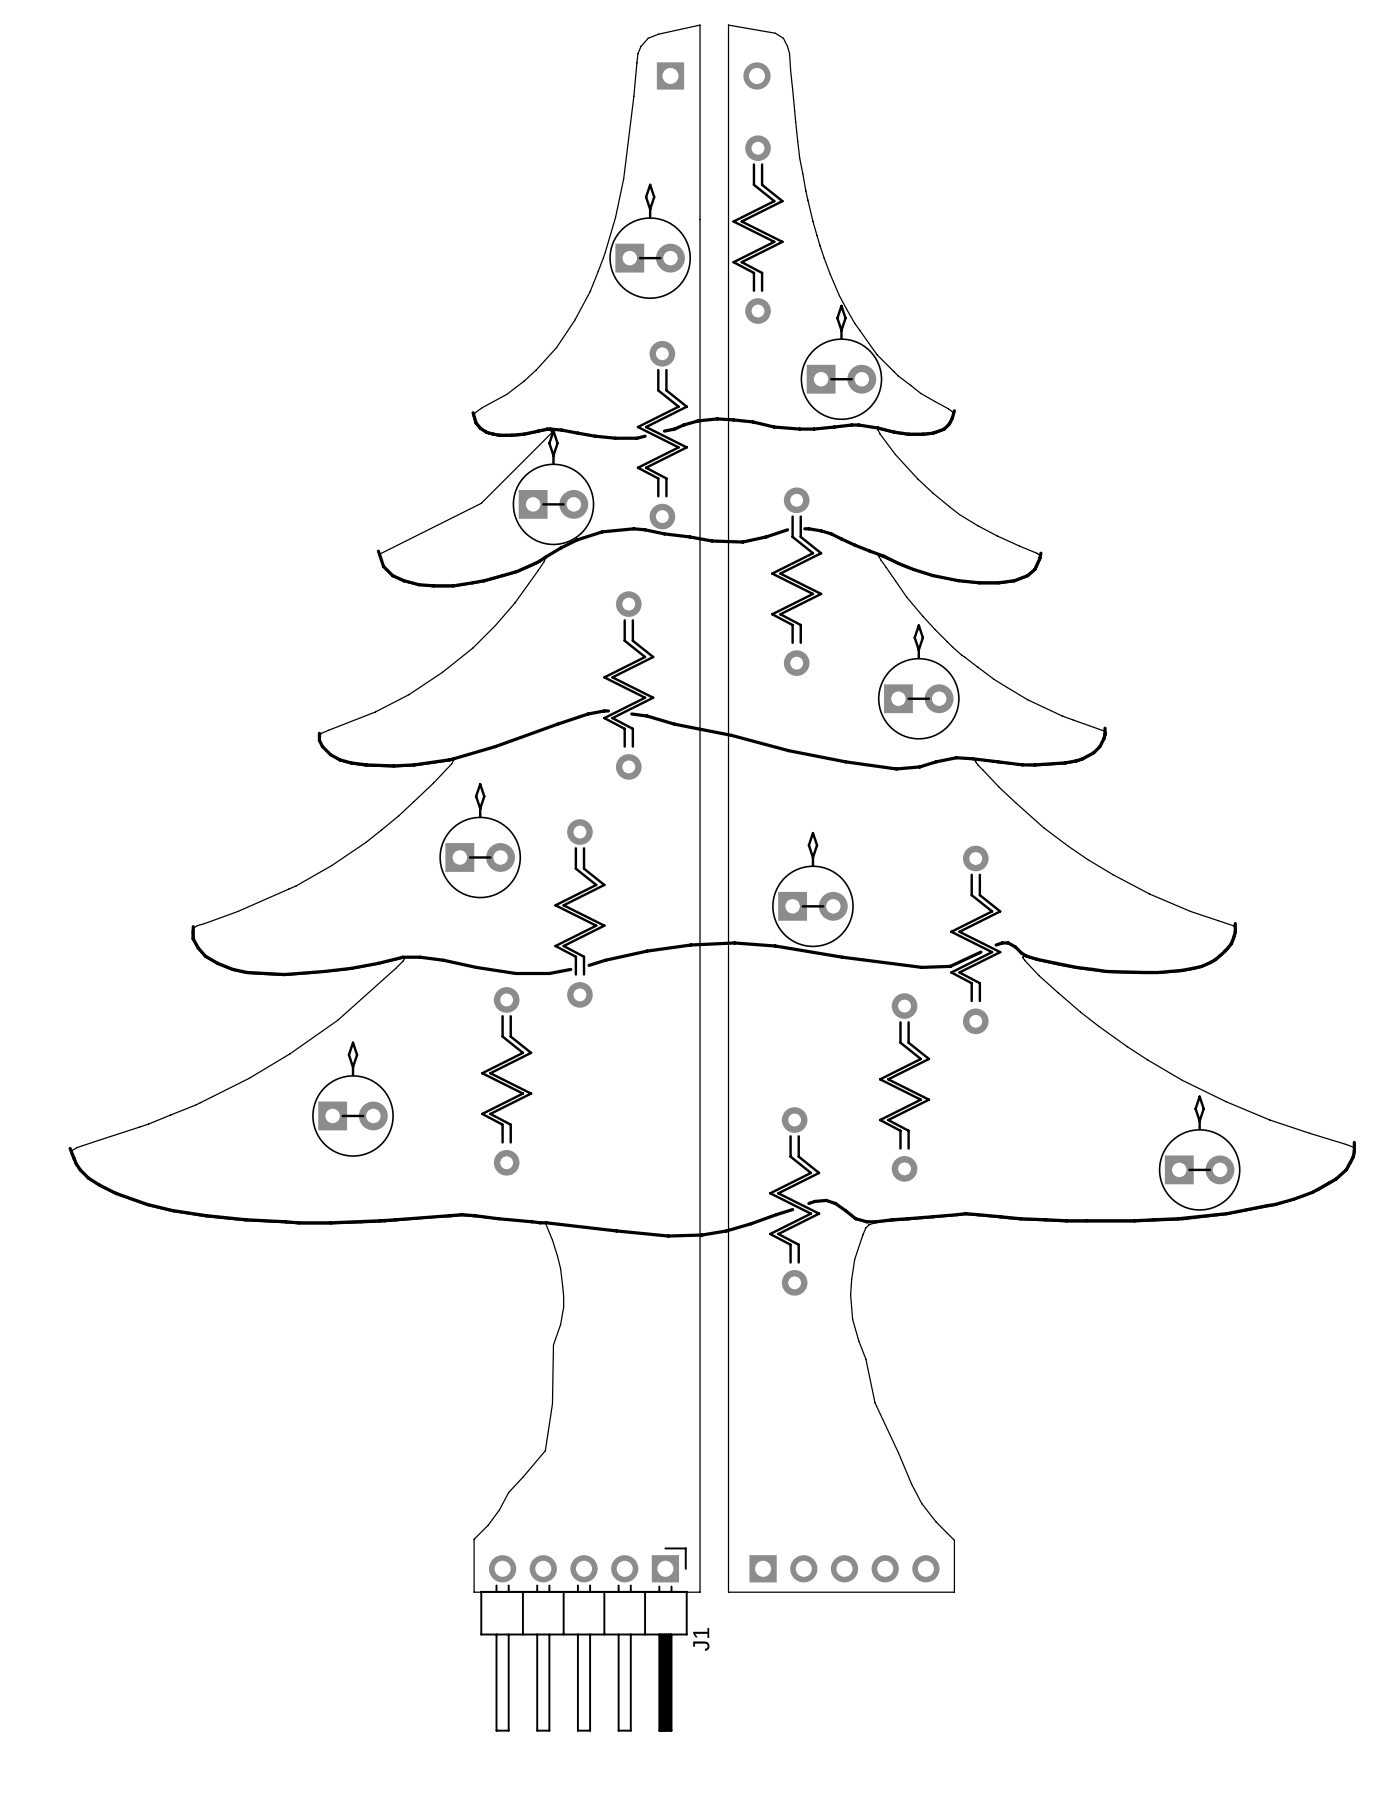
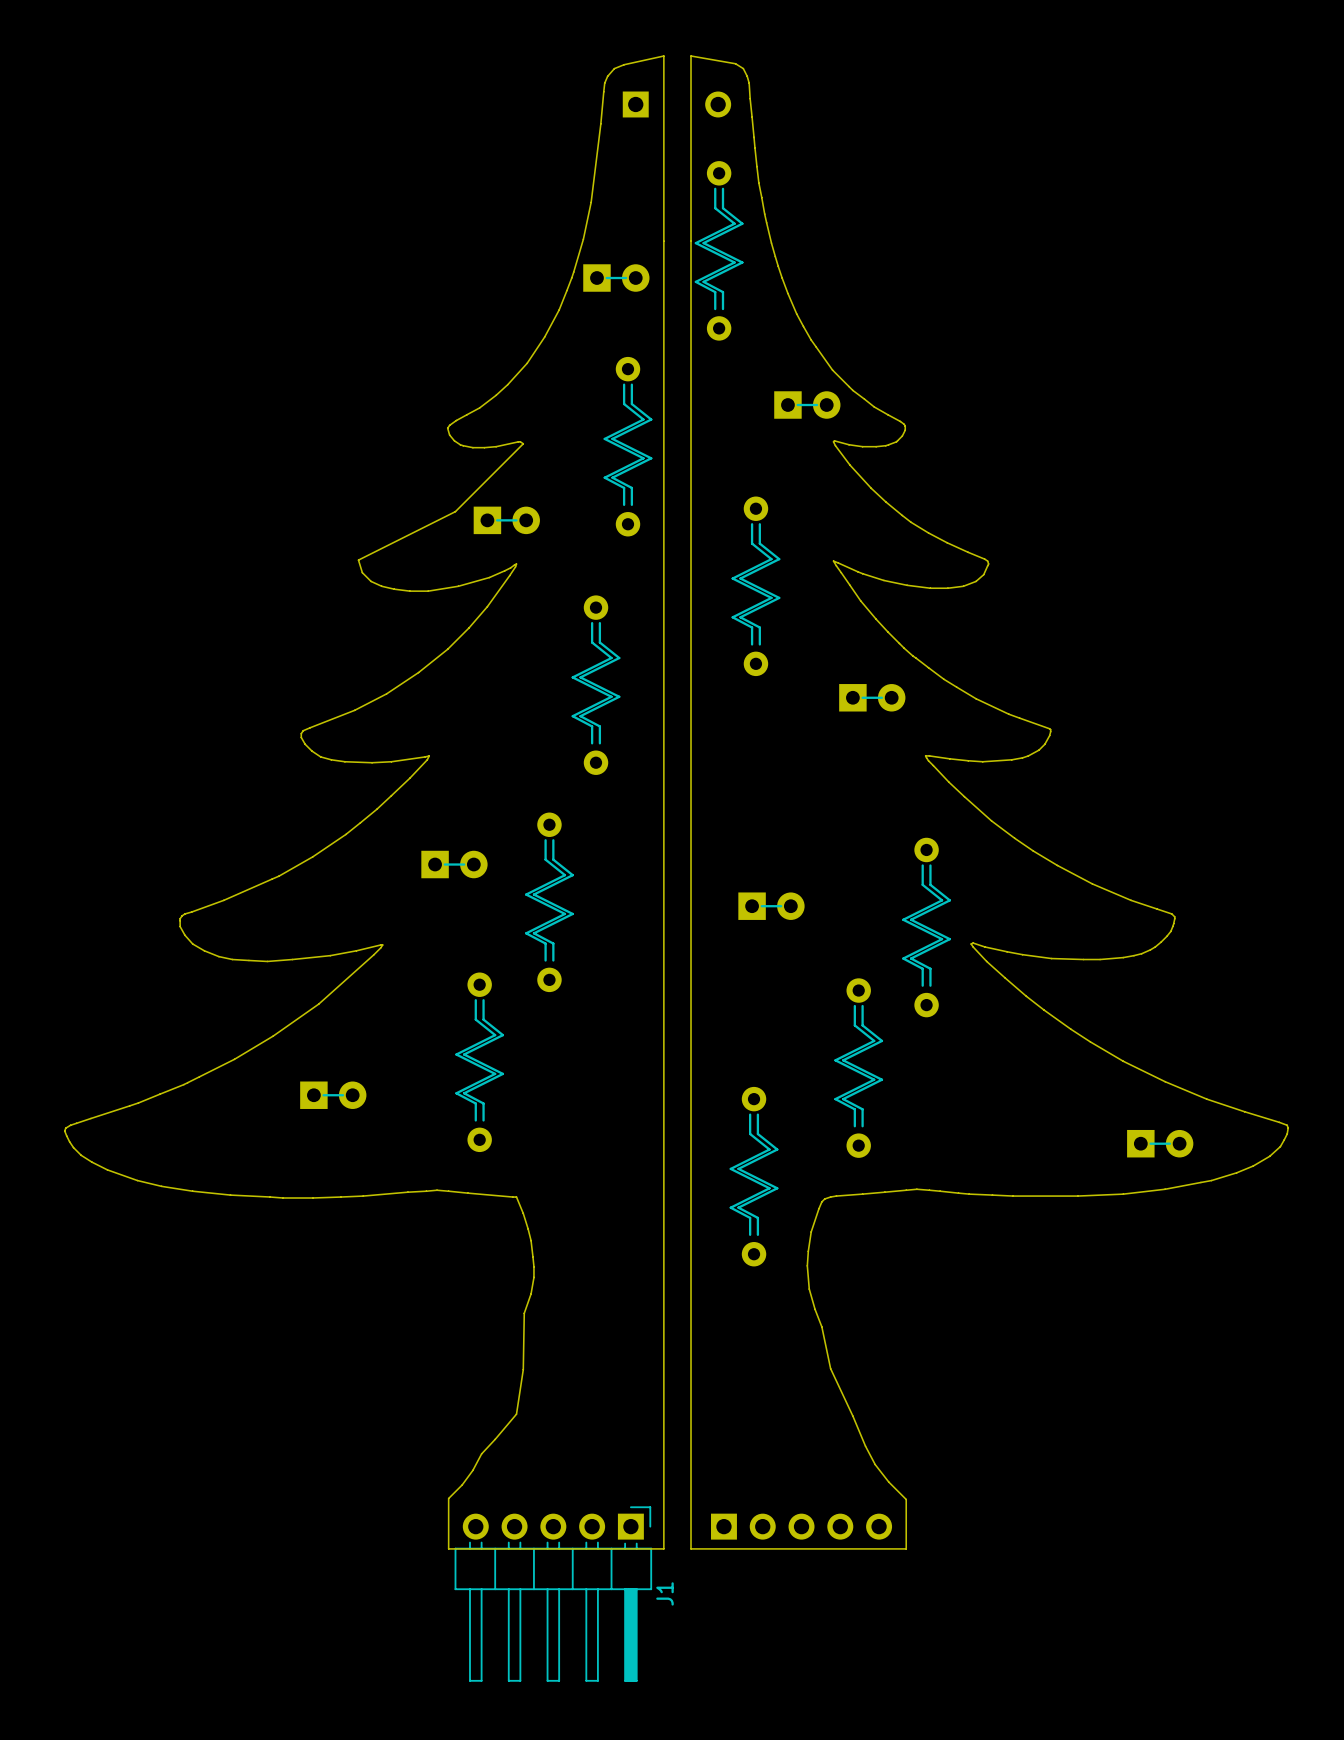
part: (650, 241) -> none
part: none -> (616, 278)
part: (841, 362) -> none
part: none -> (807, 405)
line: (954, 410) (949, 423) (944, 429) (922, 434) (894, 432) (858, 425) (799, 429) (717, 418) (697, 420) (664, 431) -> none
line: (473, 412) (476, 422) (480, 428) (486, 432) (499, 435) (523, 434) (550, 429) (615, 438) (645, 436) -> none
part: (553, 487) -> none
part: none -> (506, 520)
line: (804, 528) (831, 533) (913, 569) (958, 580) (978, 582) (1014, 580) (1027, 575) (1034, 569) (1040, 553) -> none
line: (787, 529) (742, 542) (712, 541) (633, 528) (602, 531) (576, 539) (516, 571) (484, 580) (453, 585) (419, 584) (392, 575) (383, 566) (378, 551) -> none
part: (918, 681) -> none
part: none -> (872, 697)
line: (608, 710) (588, 714) (495, 746) (453, 758) (414, 764) (366, 764) (339, 759) (330, 754) (322, 746) (319, 740) (319, 733) -> none
line: (631, 714) (731, 735) (788, 750) (896, 768) (919, 766) (956, 757) (1022, 764) (1076, 760) (1093, 752) (1099, 746) (1104, 738) (1105, 728) -> none
part: (480, 840) -> none
part: none -> (454, 864)
part: (812, 889) -> none
part: none -> (771, 906)
line: (1235, 923) (1235, 931) (1231, 943) (1215, 959) (1201, 966) (1181, 970) (1157, 972) (1107, 971) (1076, 967) (1026, 956) (1008, 942) (996, 945) -> none
line: (193, 926) (193, 938) (205, 956) (232, 969) (247, 972) (284, 974) (324, 971) (350, 968) (402, 957) (443, 960) (515, 973) (549, 973) (570, 969) -> none
line: (980, 952) (950, 966) (921, 967) (775, 946) (734, 942) (690, 945) (647, 951) (589, 965) -> none
part: (353, 1099) -> none
part: none -> (333, 1095)
line: (1354, 1142) (1353, 1156) (1346, 1169) (1336, 1179) (1312, 1192) (1274, 1204) (1227, 1213) (1134, 1220) (1066, 1220) (965, 1213) (866, 1221) (855, 1218) (835, 1203) (826, 1200) (808, 1203) -> none
line: (70, 1148) (76, 1163) (88, 1178) (115, 1193) (147, 1204) (172, 1210) (246, 1219) (330, 1222) (461, 1214) (668, 1236) (702, 1235) (726, 1230) (792, 1209) -> none
part: (1199, 1153) -> none
part: none -> (1160, 1143)

